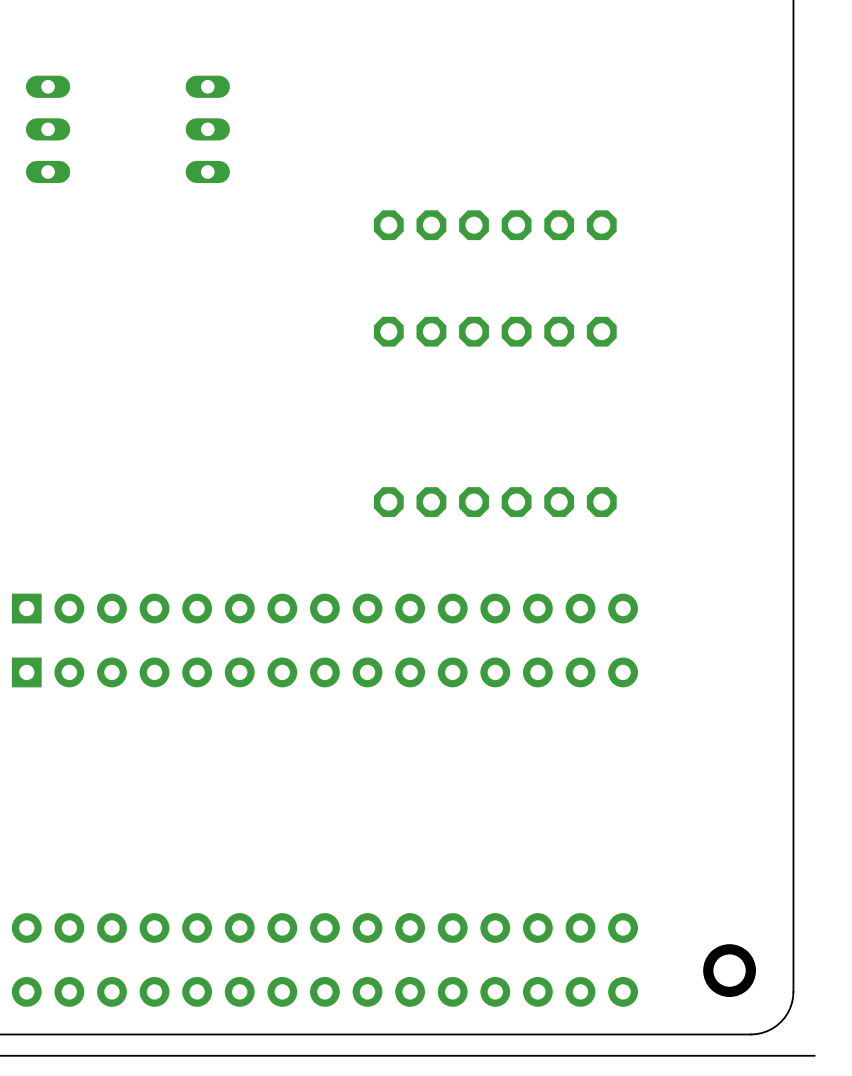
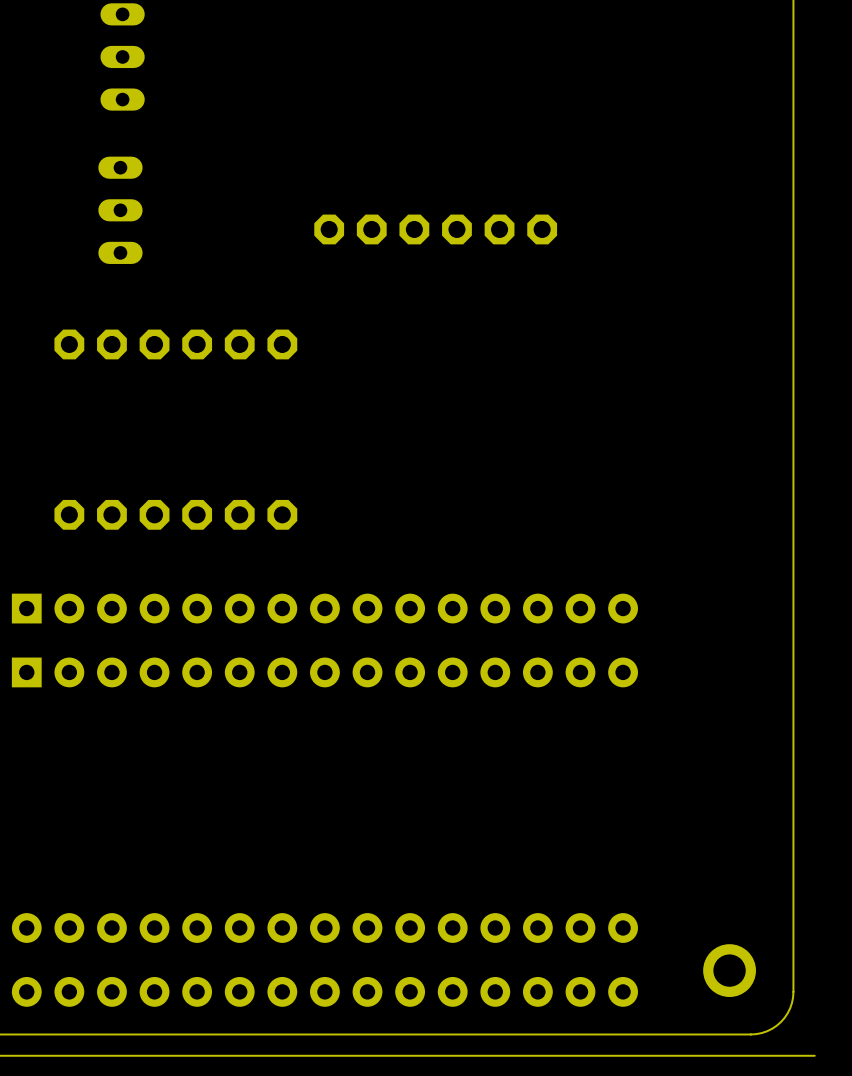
part: none -> (122, 56)
part: (48, 129) -> none
part: (207, 129) -> none
part: none -> (120, 210)
part: (495, 225) -> none
part: none -> (435, 229)
part: (495, 331) -> none
part: none -> (175, 344)
part: (495, 502) -> none
part: none -> (175, 514)

